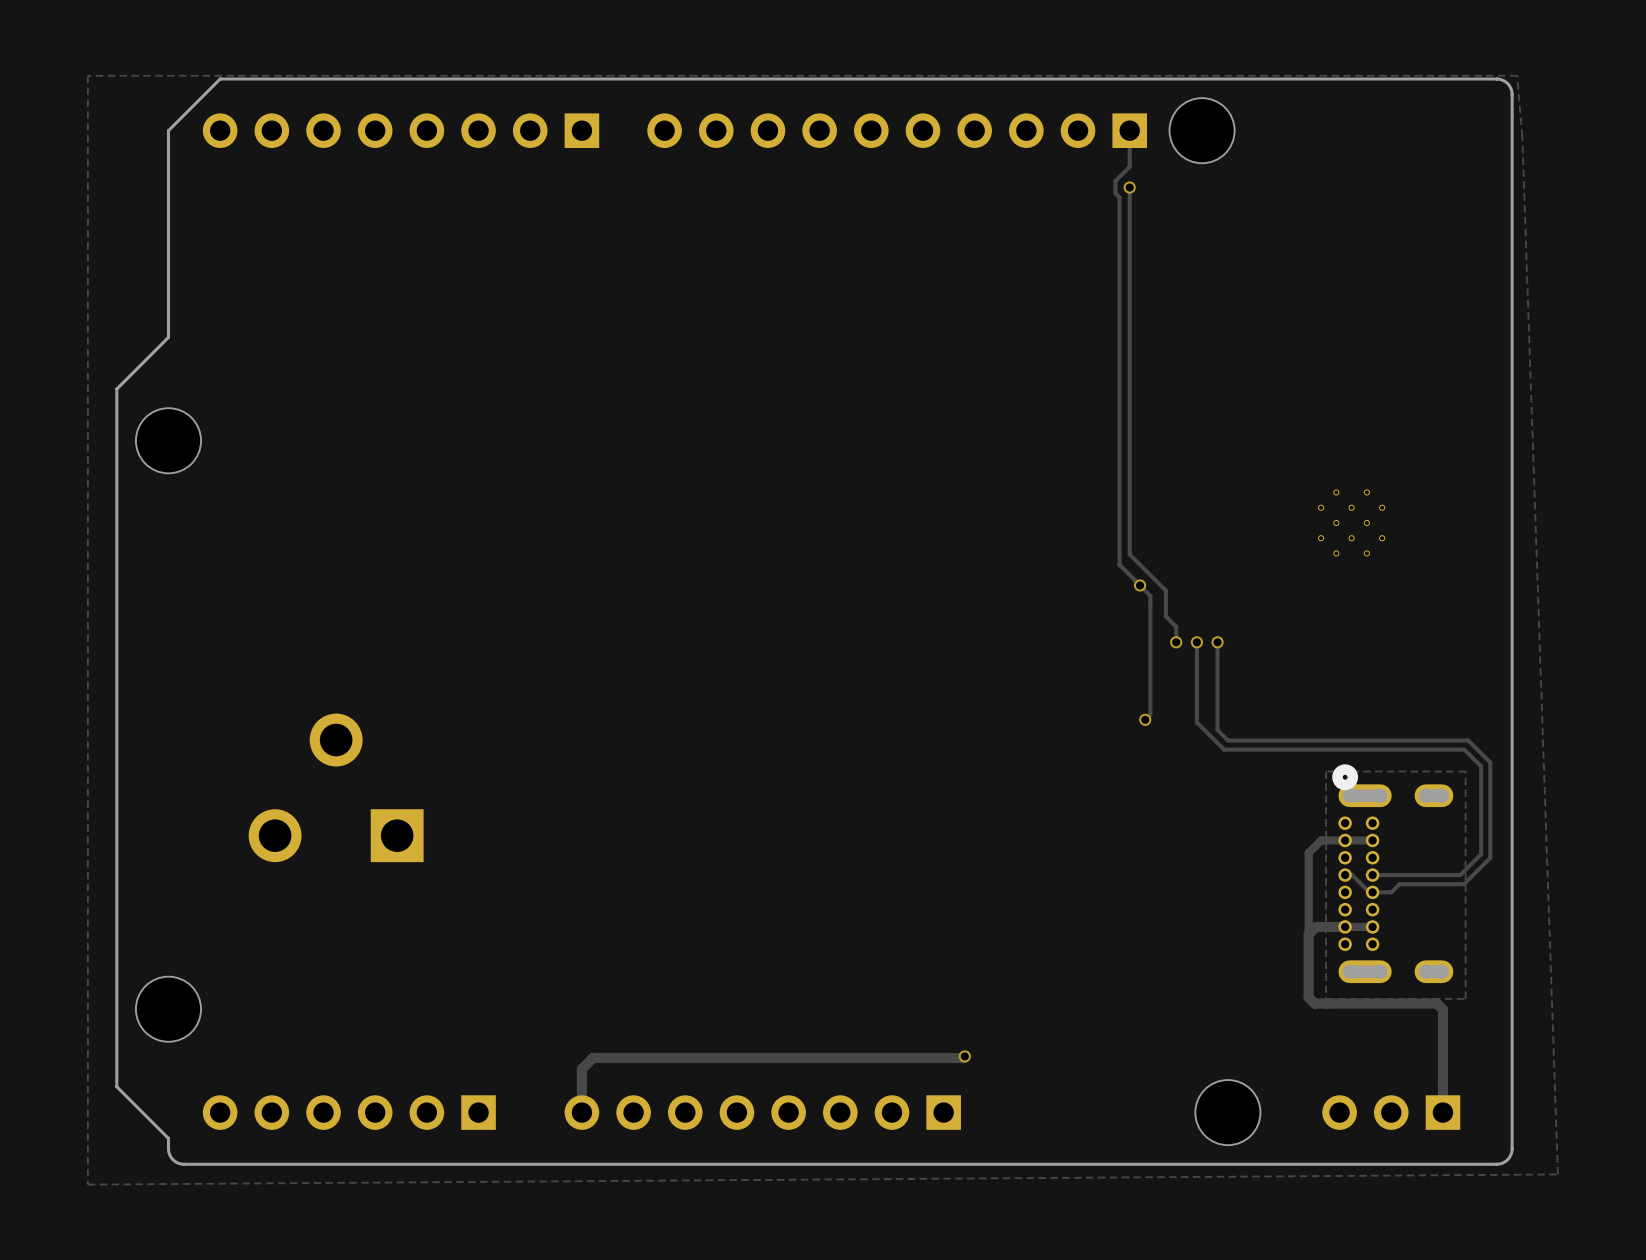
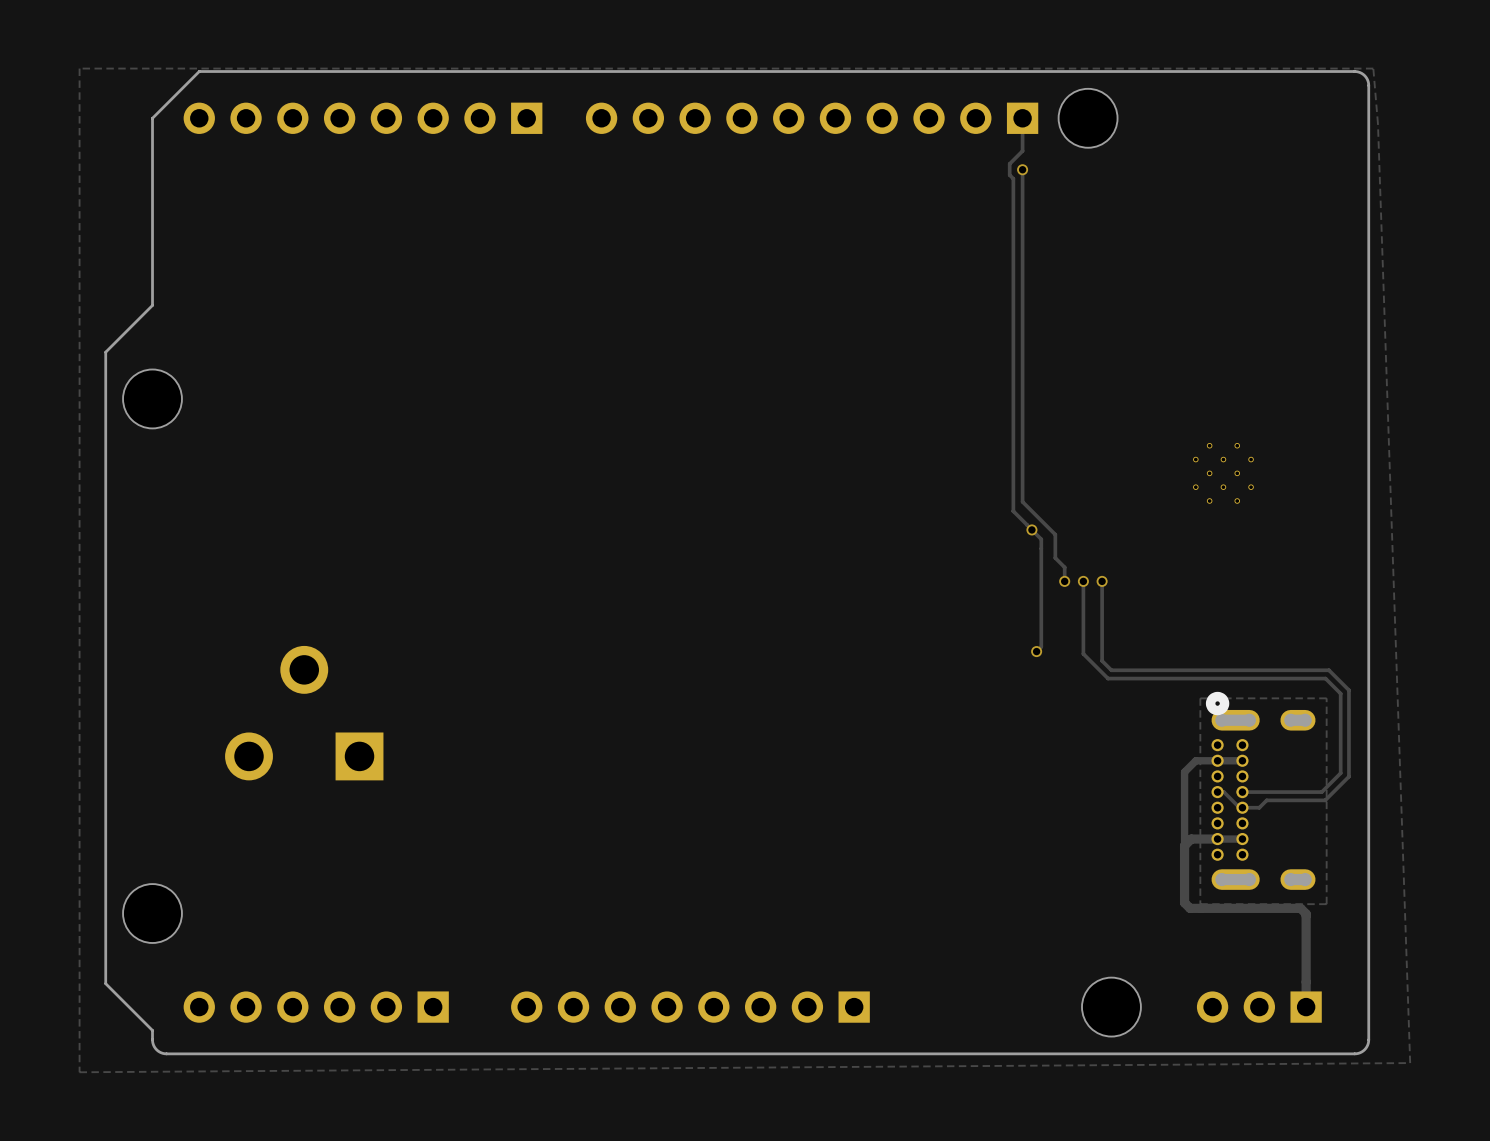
track: (964, 1056) (963, 1058) (592, 1058) (581, 1069) (581, 1112) -> none
via: (964, 1056) -> none

